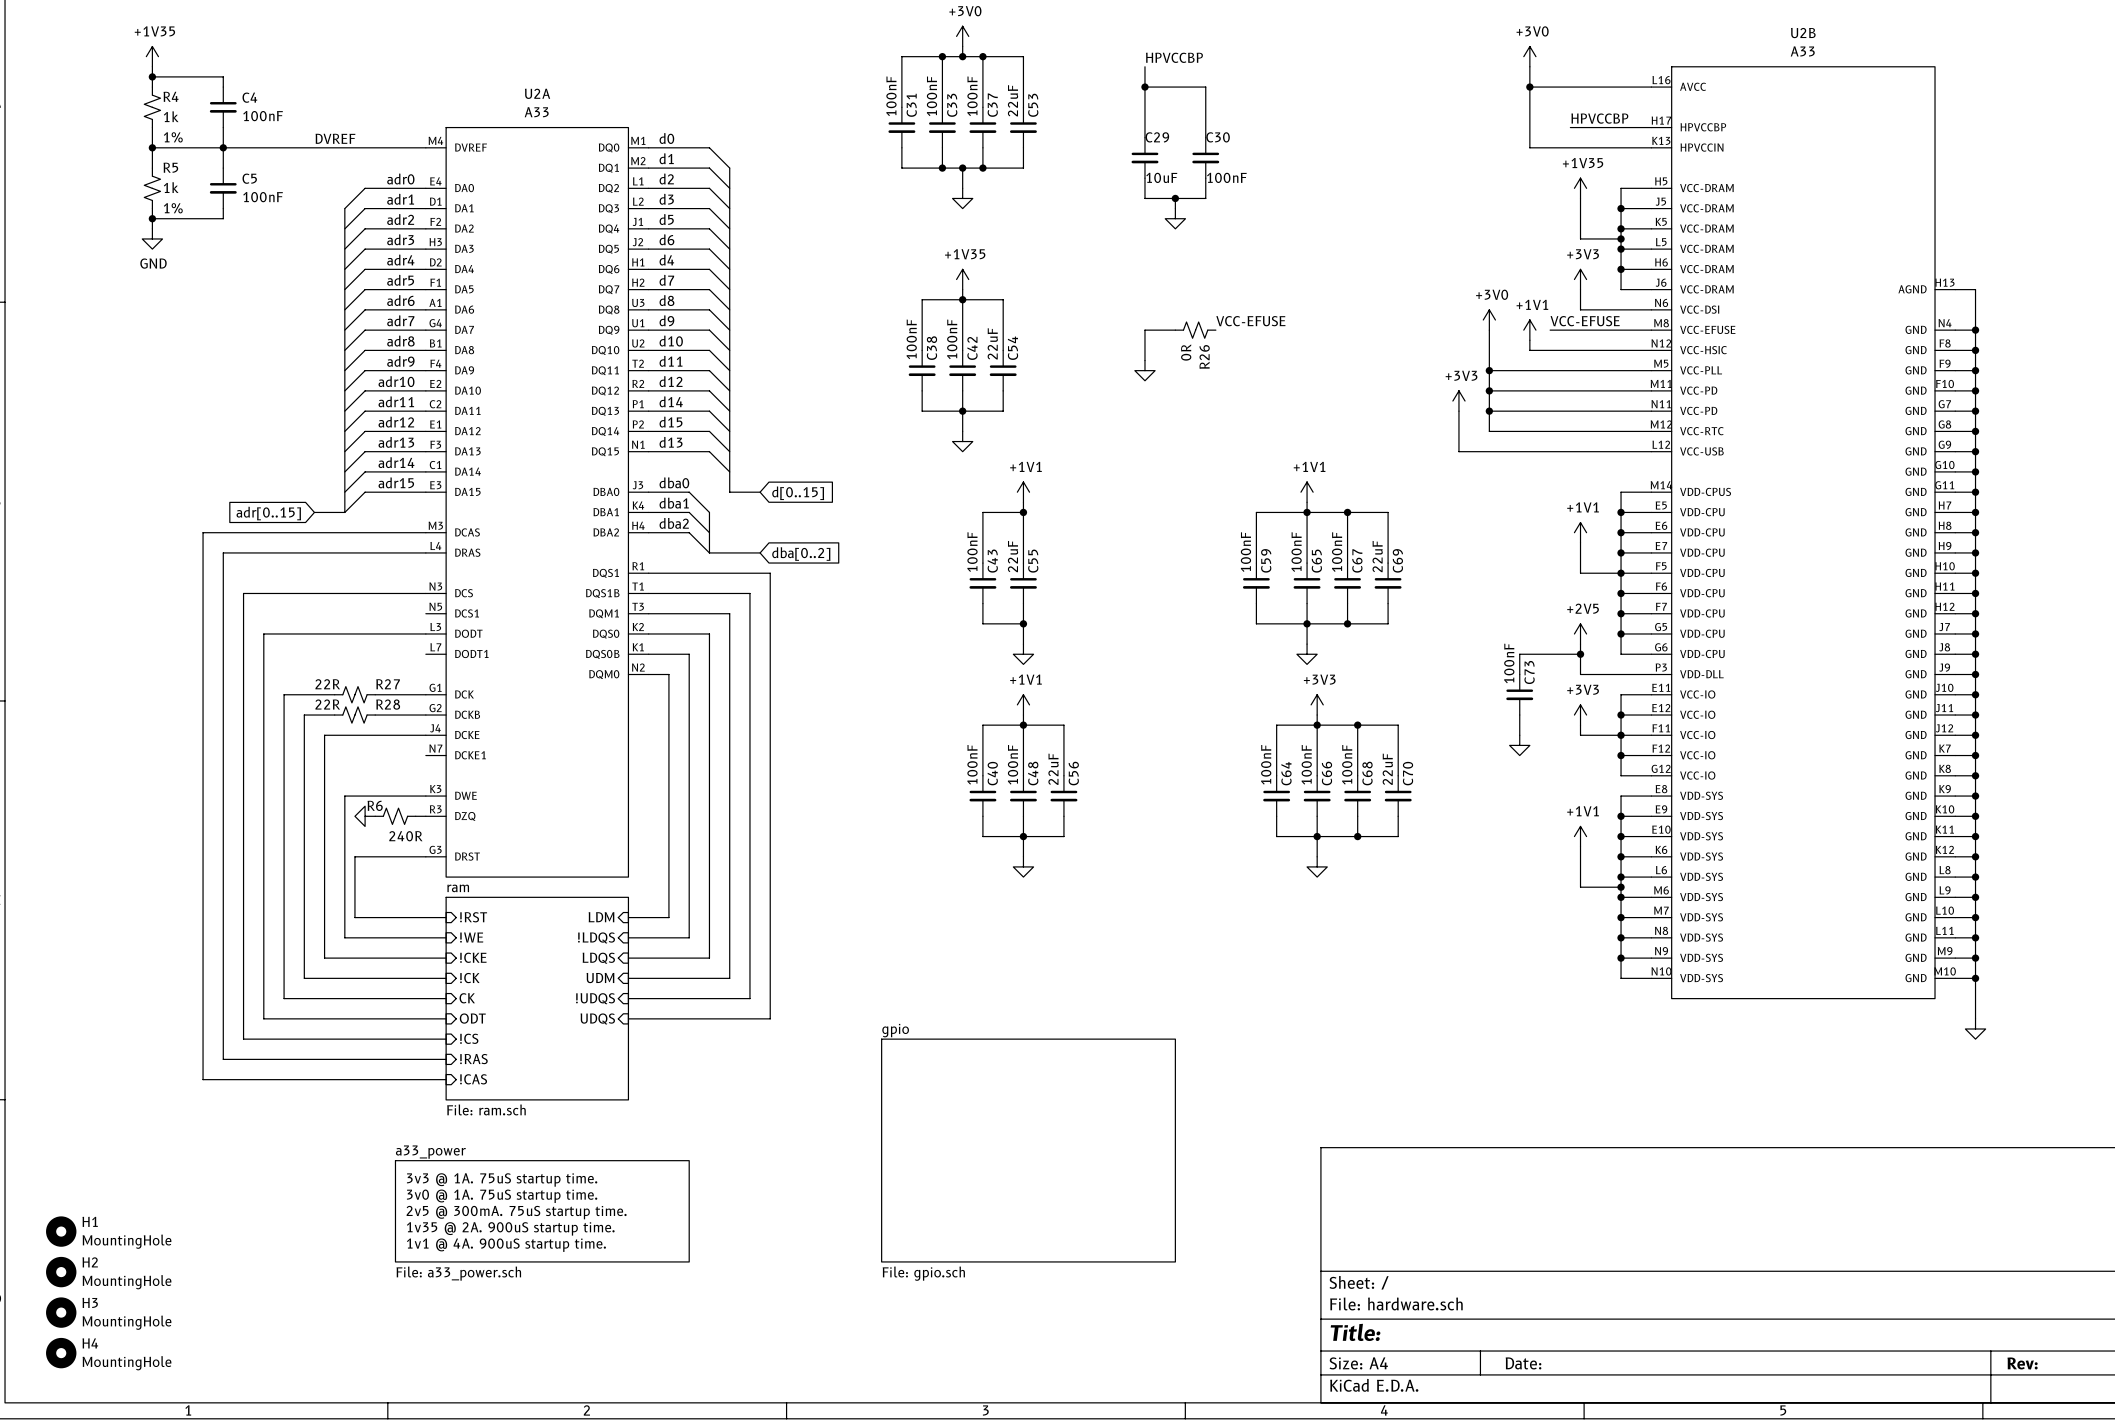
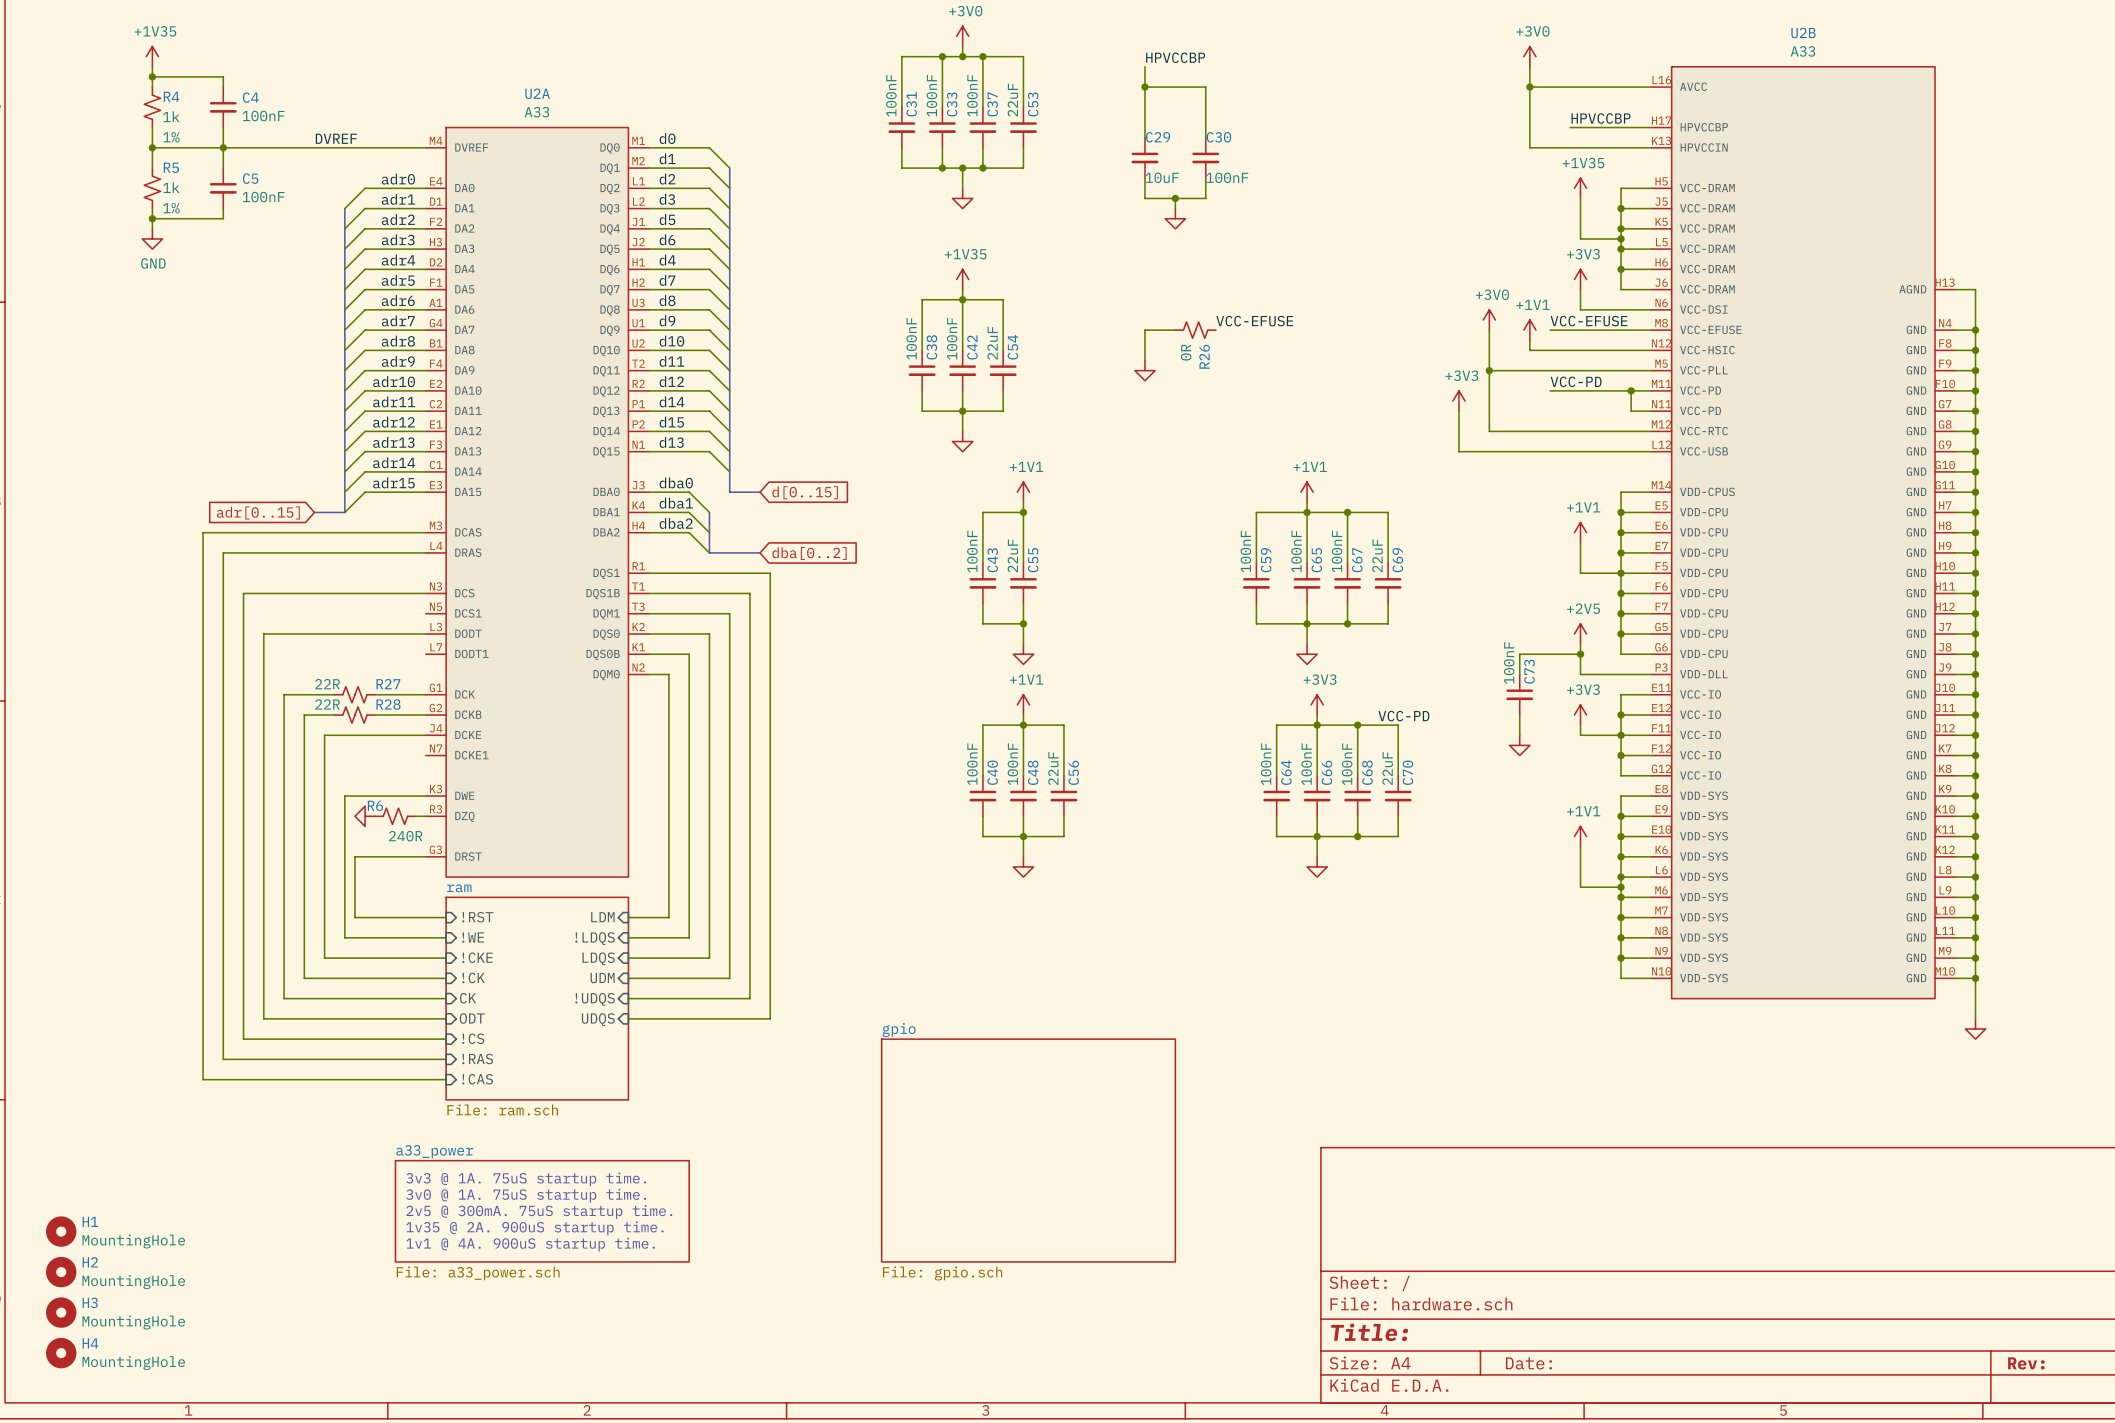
label: none -> VCC-PD (1576, 381)
wire: (1489, 390) (1550, 390) -> none
junction: (1489, 390) -> none
junction: none -> (1631, 390)
wire: (1489, 411) (1631, 411) -> (1631, 390) (1631, 411)
junction: (1489, 411) -> none
label: none -> VCC-PD (1403, 716)

